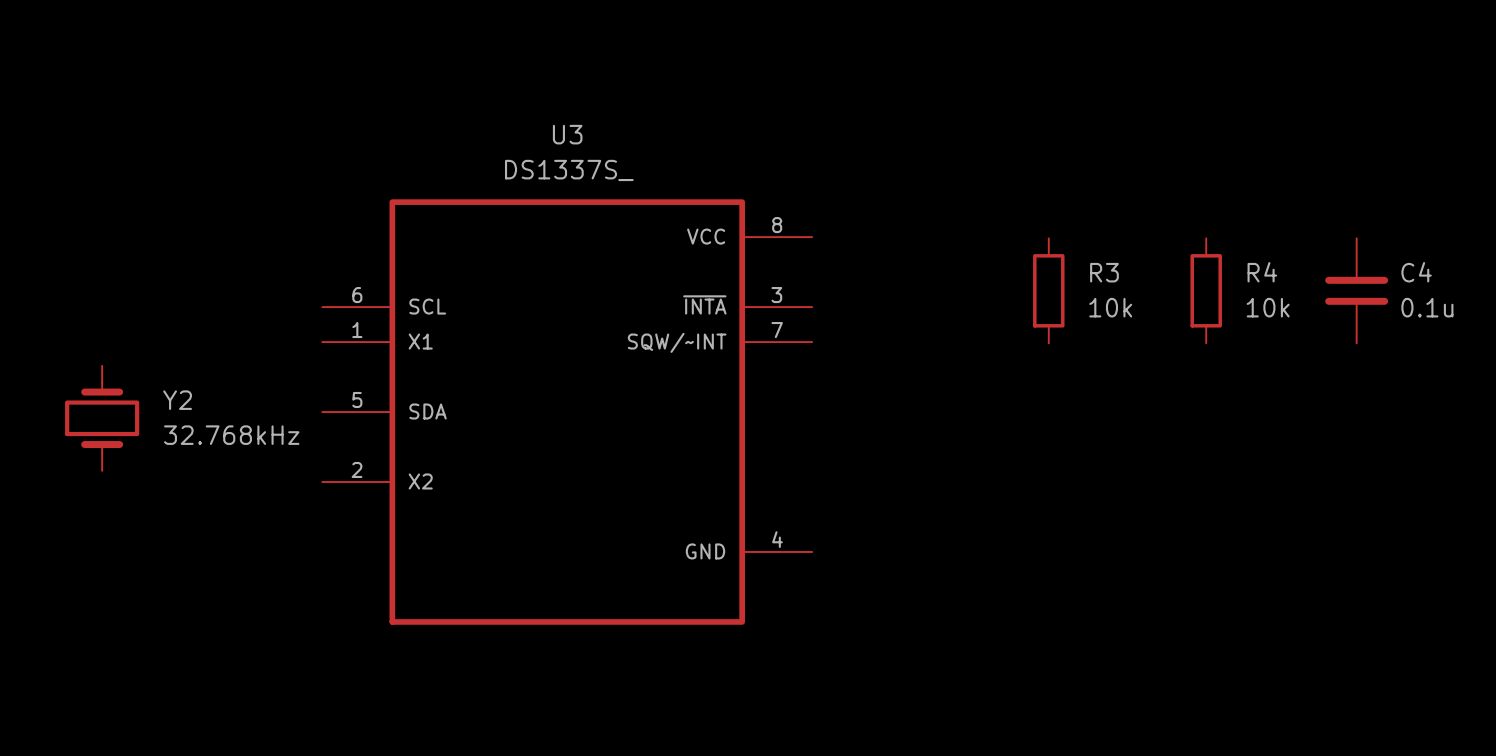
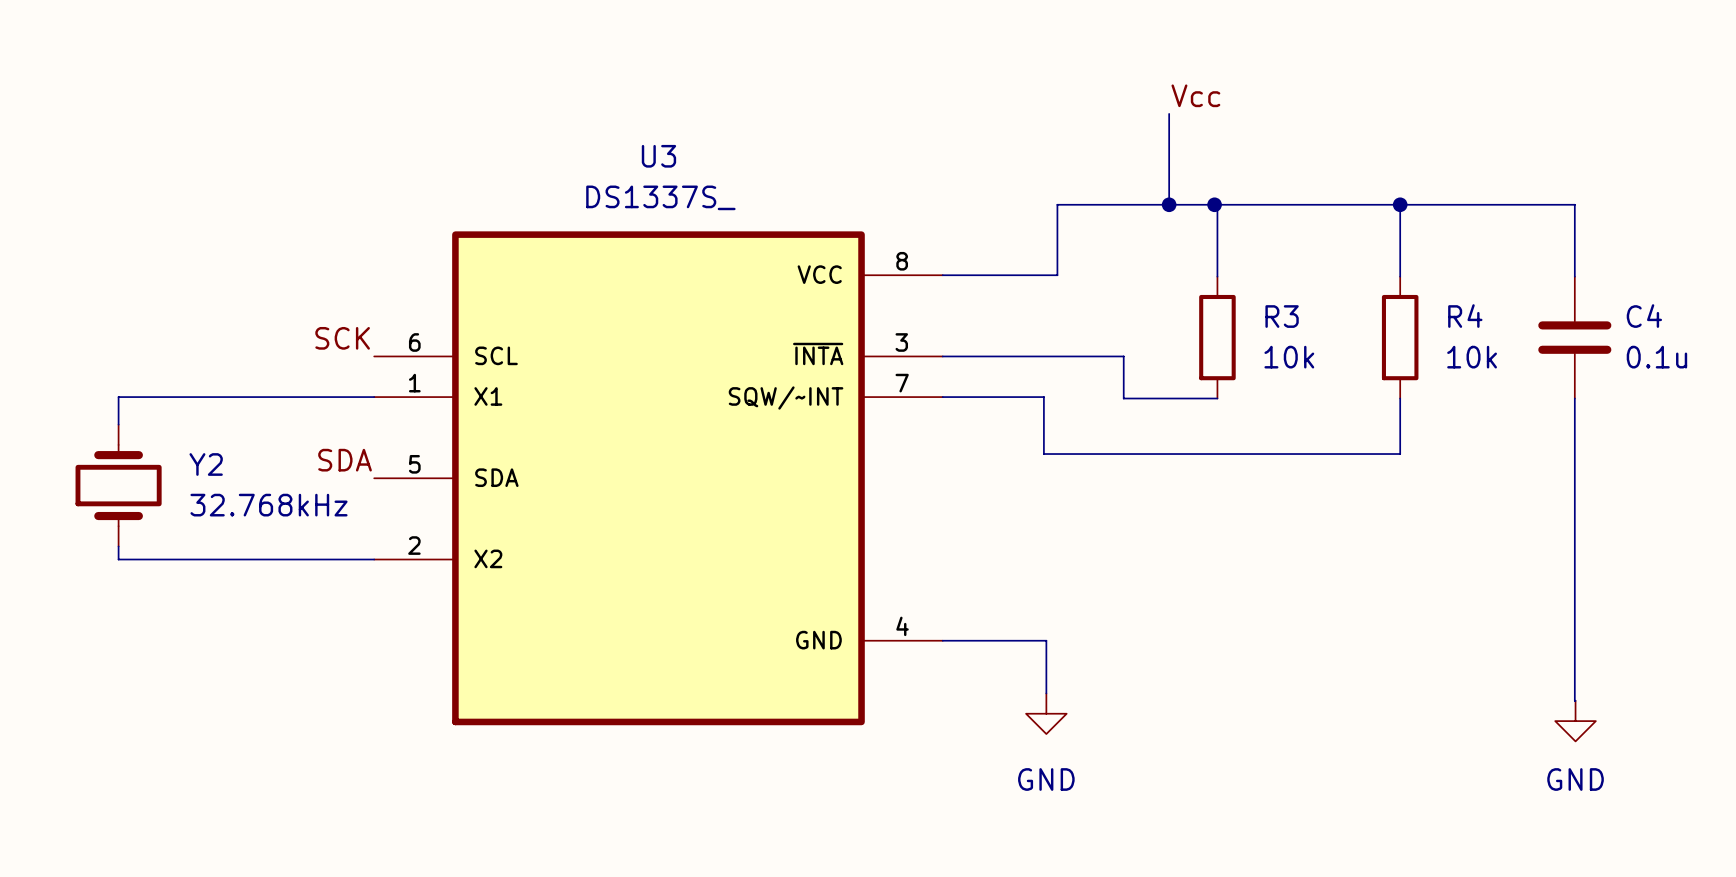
label: none -> Vcc (1195, 95)
wire: none -> (1169, 113) (1169, 204)
junction: none -> (1169, 204)
wire: none -> (1214, 204) (1217, 206) (1217, 276)
junction: none -> (1214, 204)
wire: none -> (1400, 204) (1400, 276)
junction: none -> (1400, 204)
wire: none -> (942, 275) (1057, 275) (1057, 204) (1574, 204) (1574, 276)
label: none -> SCK (342, 338)
wire: none -> (942, 356) (1123, 356) (1123, 398) (1217, 398)
wire: none -> (374, 397) (118, 397) (118, 424)
wire: none -> (942, 397) (1043, 397) (1043, 454) (1400, 454) (1400, 398)
wire: none -> (1574, 398) (1575, 700)
label: none -> SDA (345, 460)
wire: none -> (118, 546) (118, 559) (374, 559)
wire: none -> (942, 640) (1046, 640) (1046, 693)
power symbol: none -> GND (1046, 713)
power symbol: none -> GND (1575, 721)

